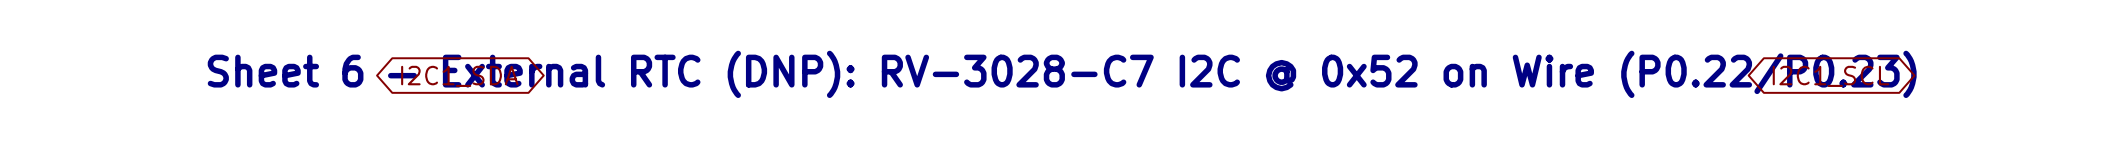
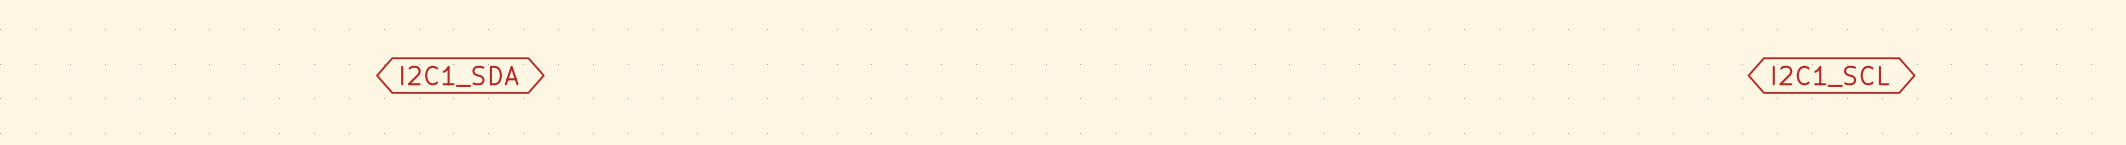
text: Sheet 6 — External RTC (DNP): RV-3028-C7 I2C @ 0x52 on Wire (P0.22/P0.23) (1062, 74) -> none

